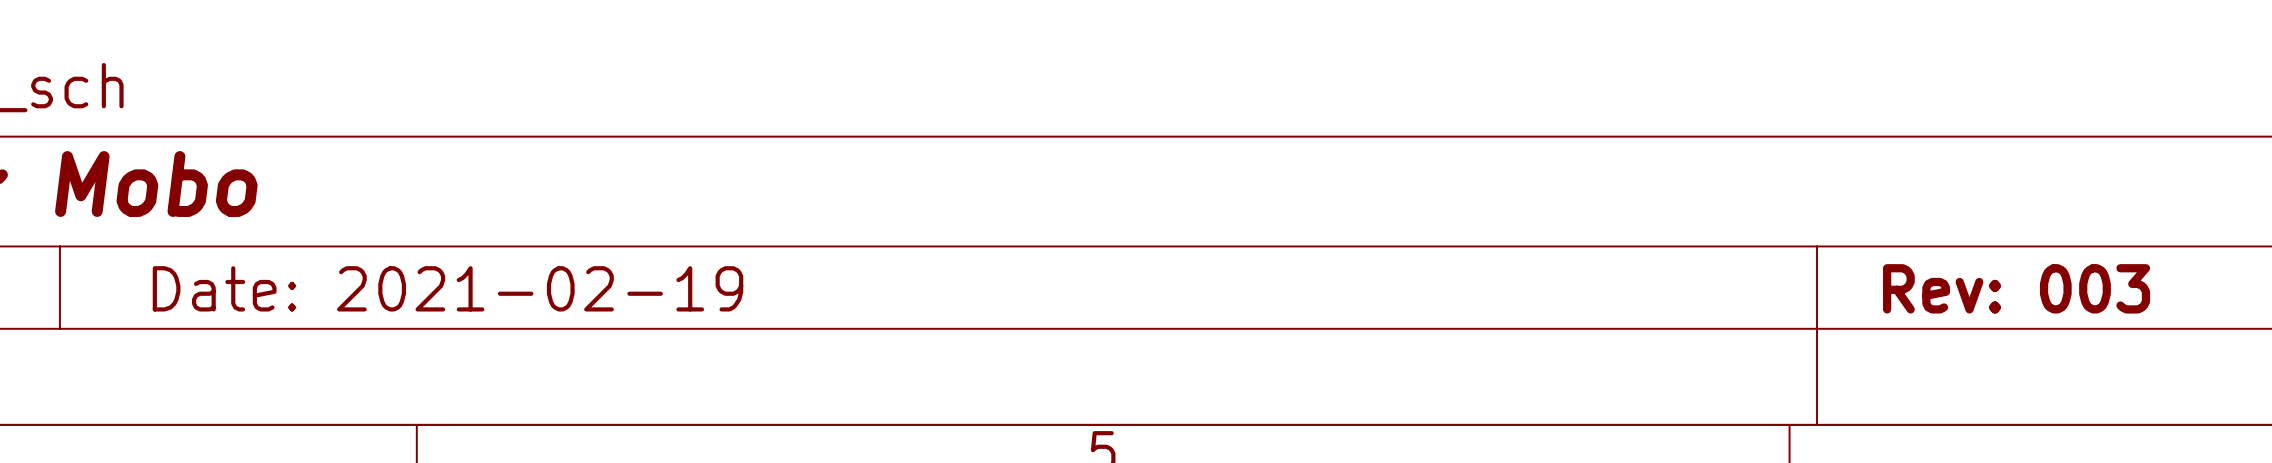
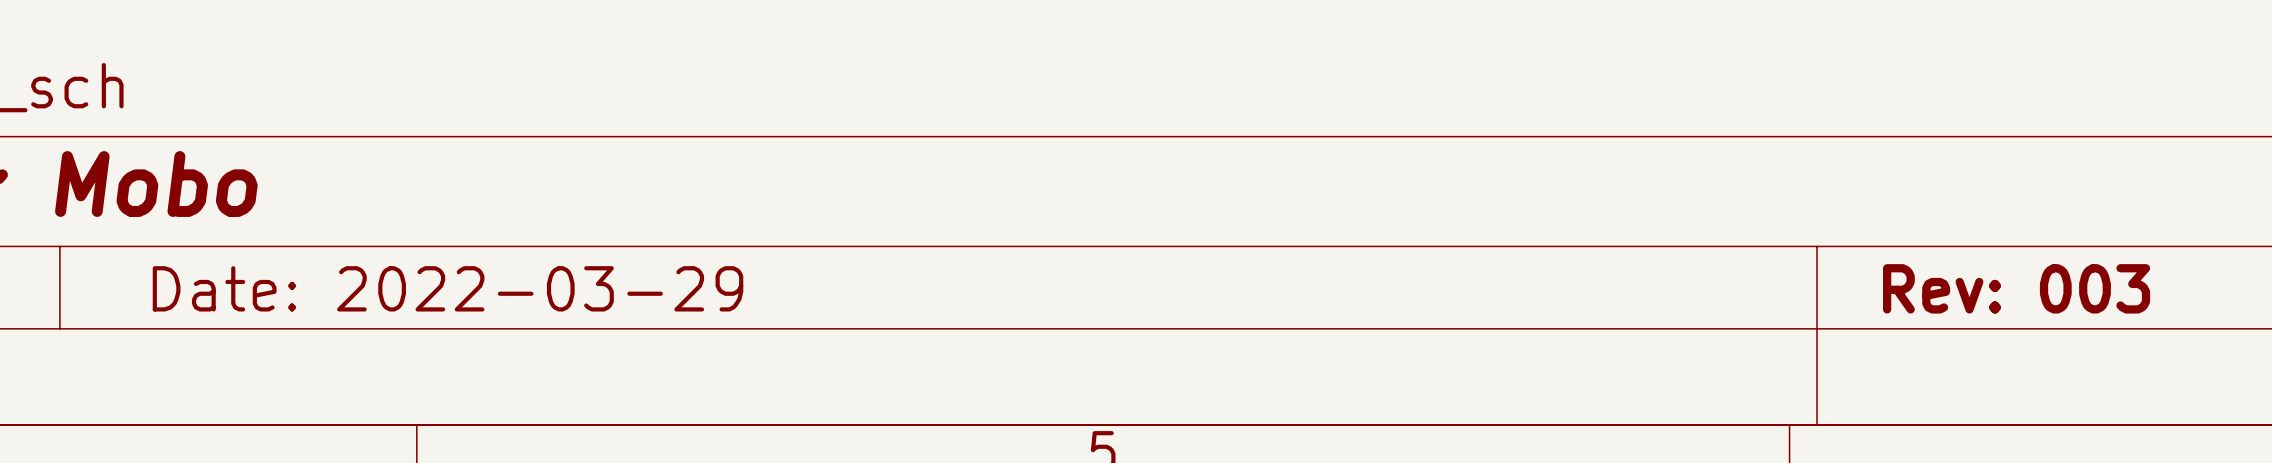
title block: Date: 2021-02-19 (448, 288) -> Date: 2022-03-29 (448, 288)

